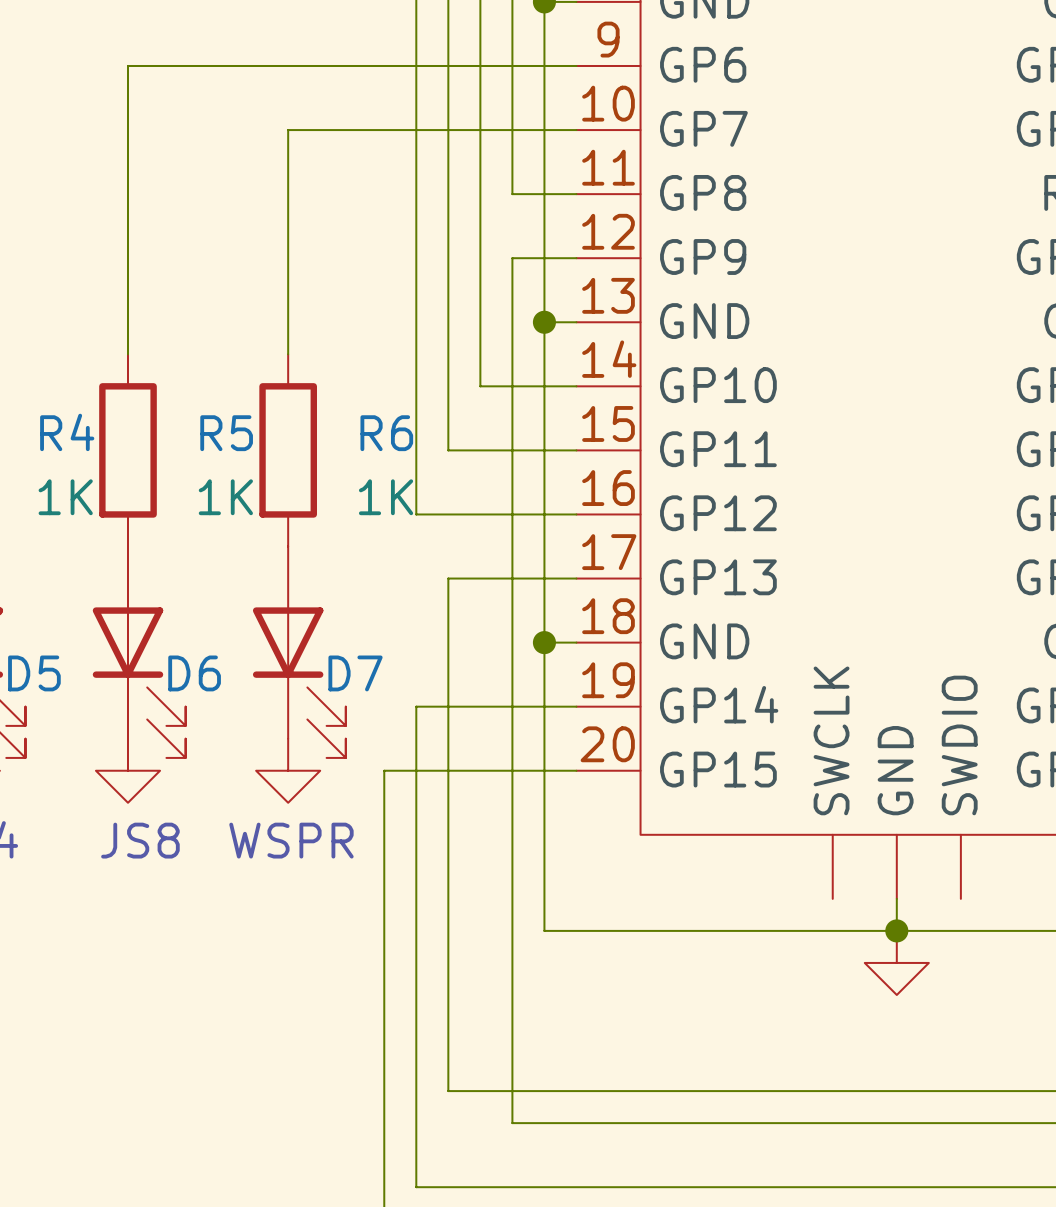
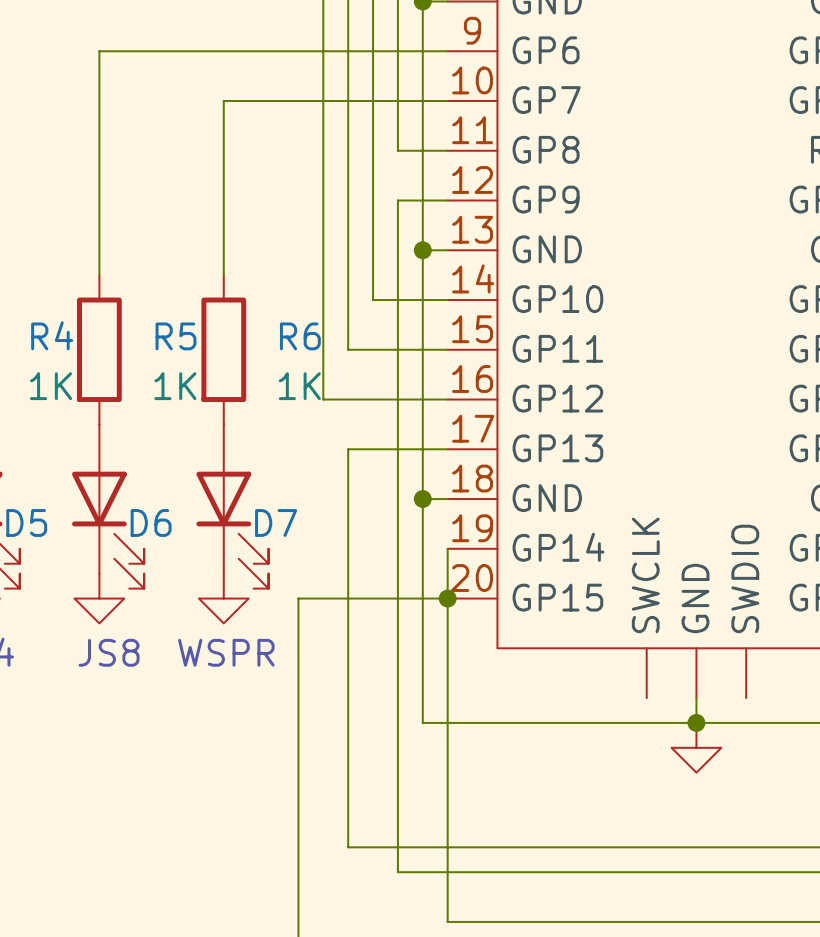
wire: (576, 706) (416, 706) (416, 1187) (576, 1187) -> (447, 548) (447, 921)
junction: none -> (447, 598)

